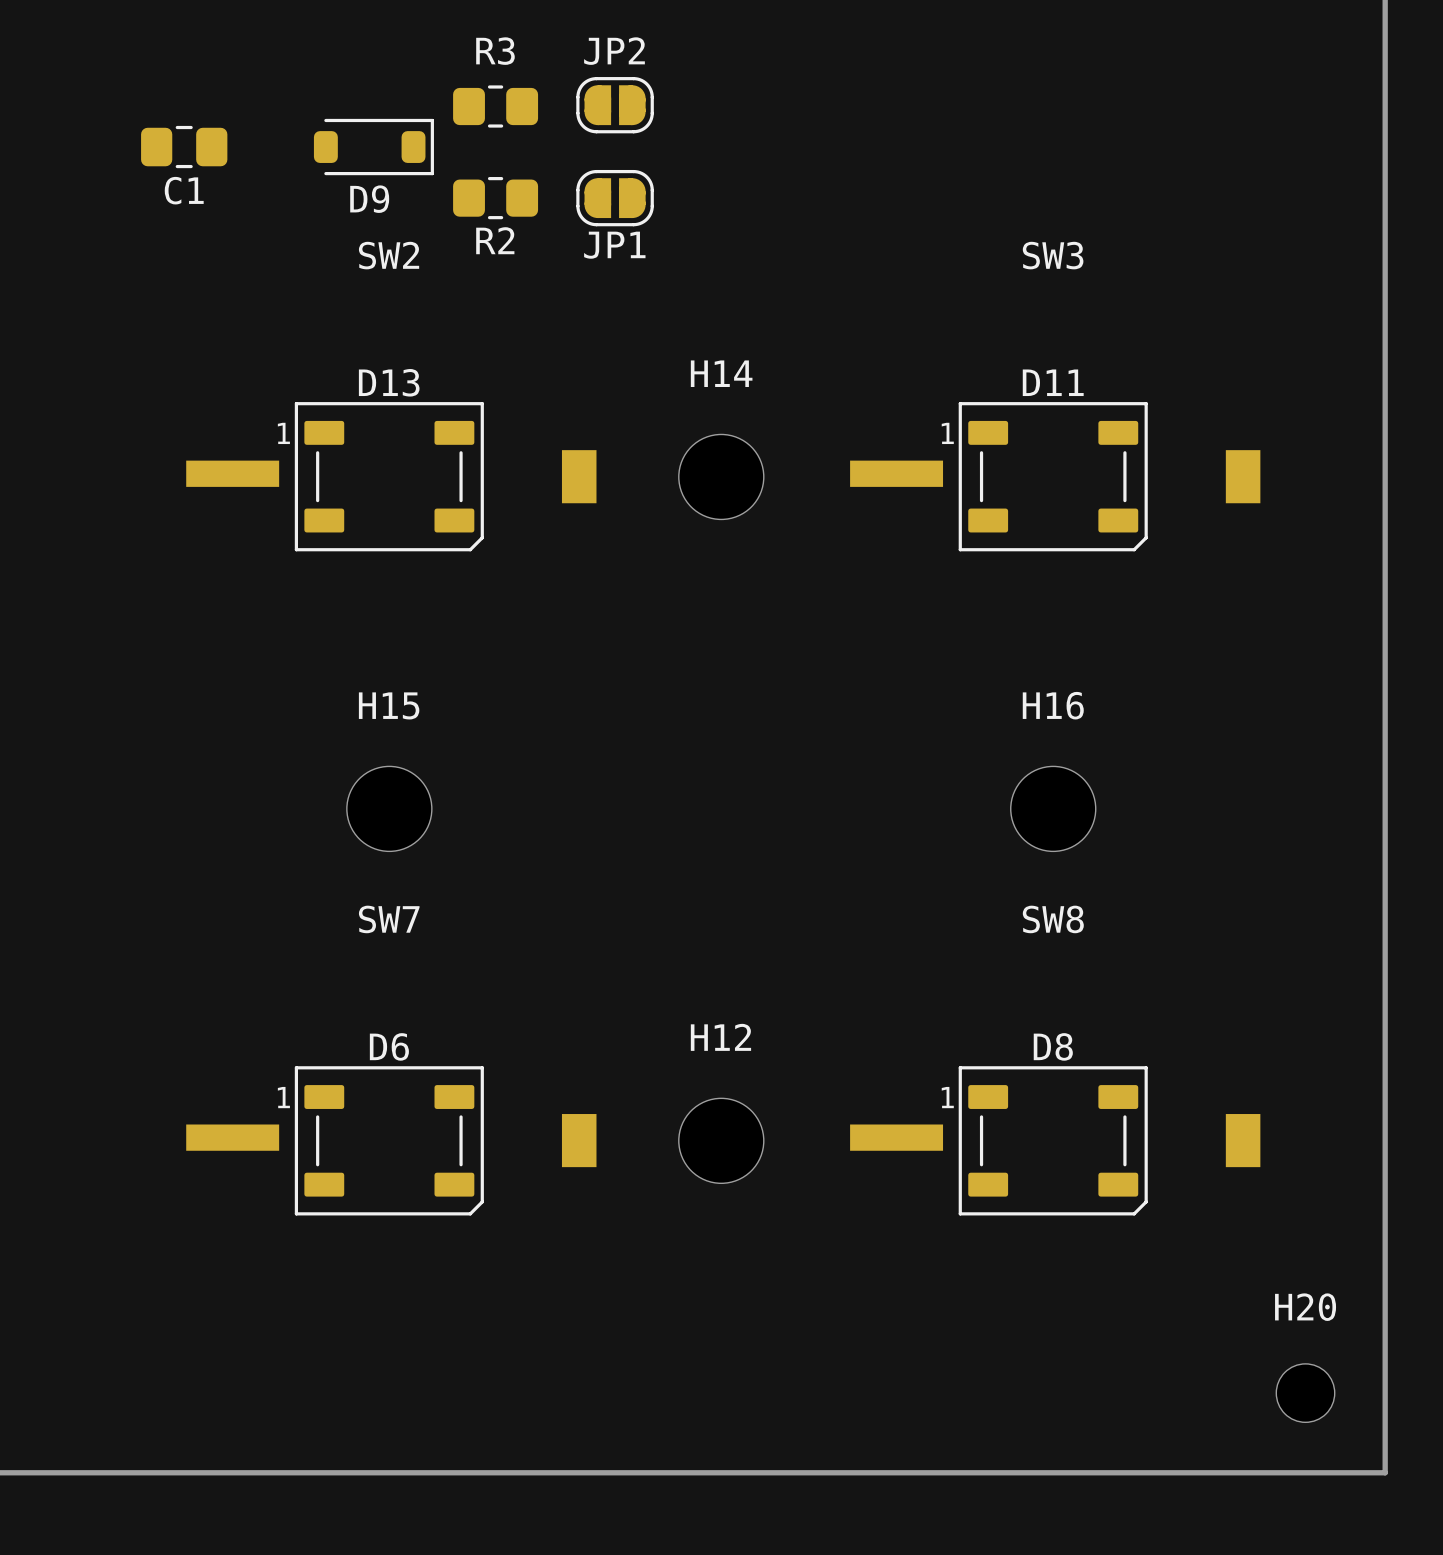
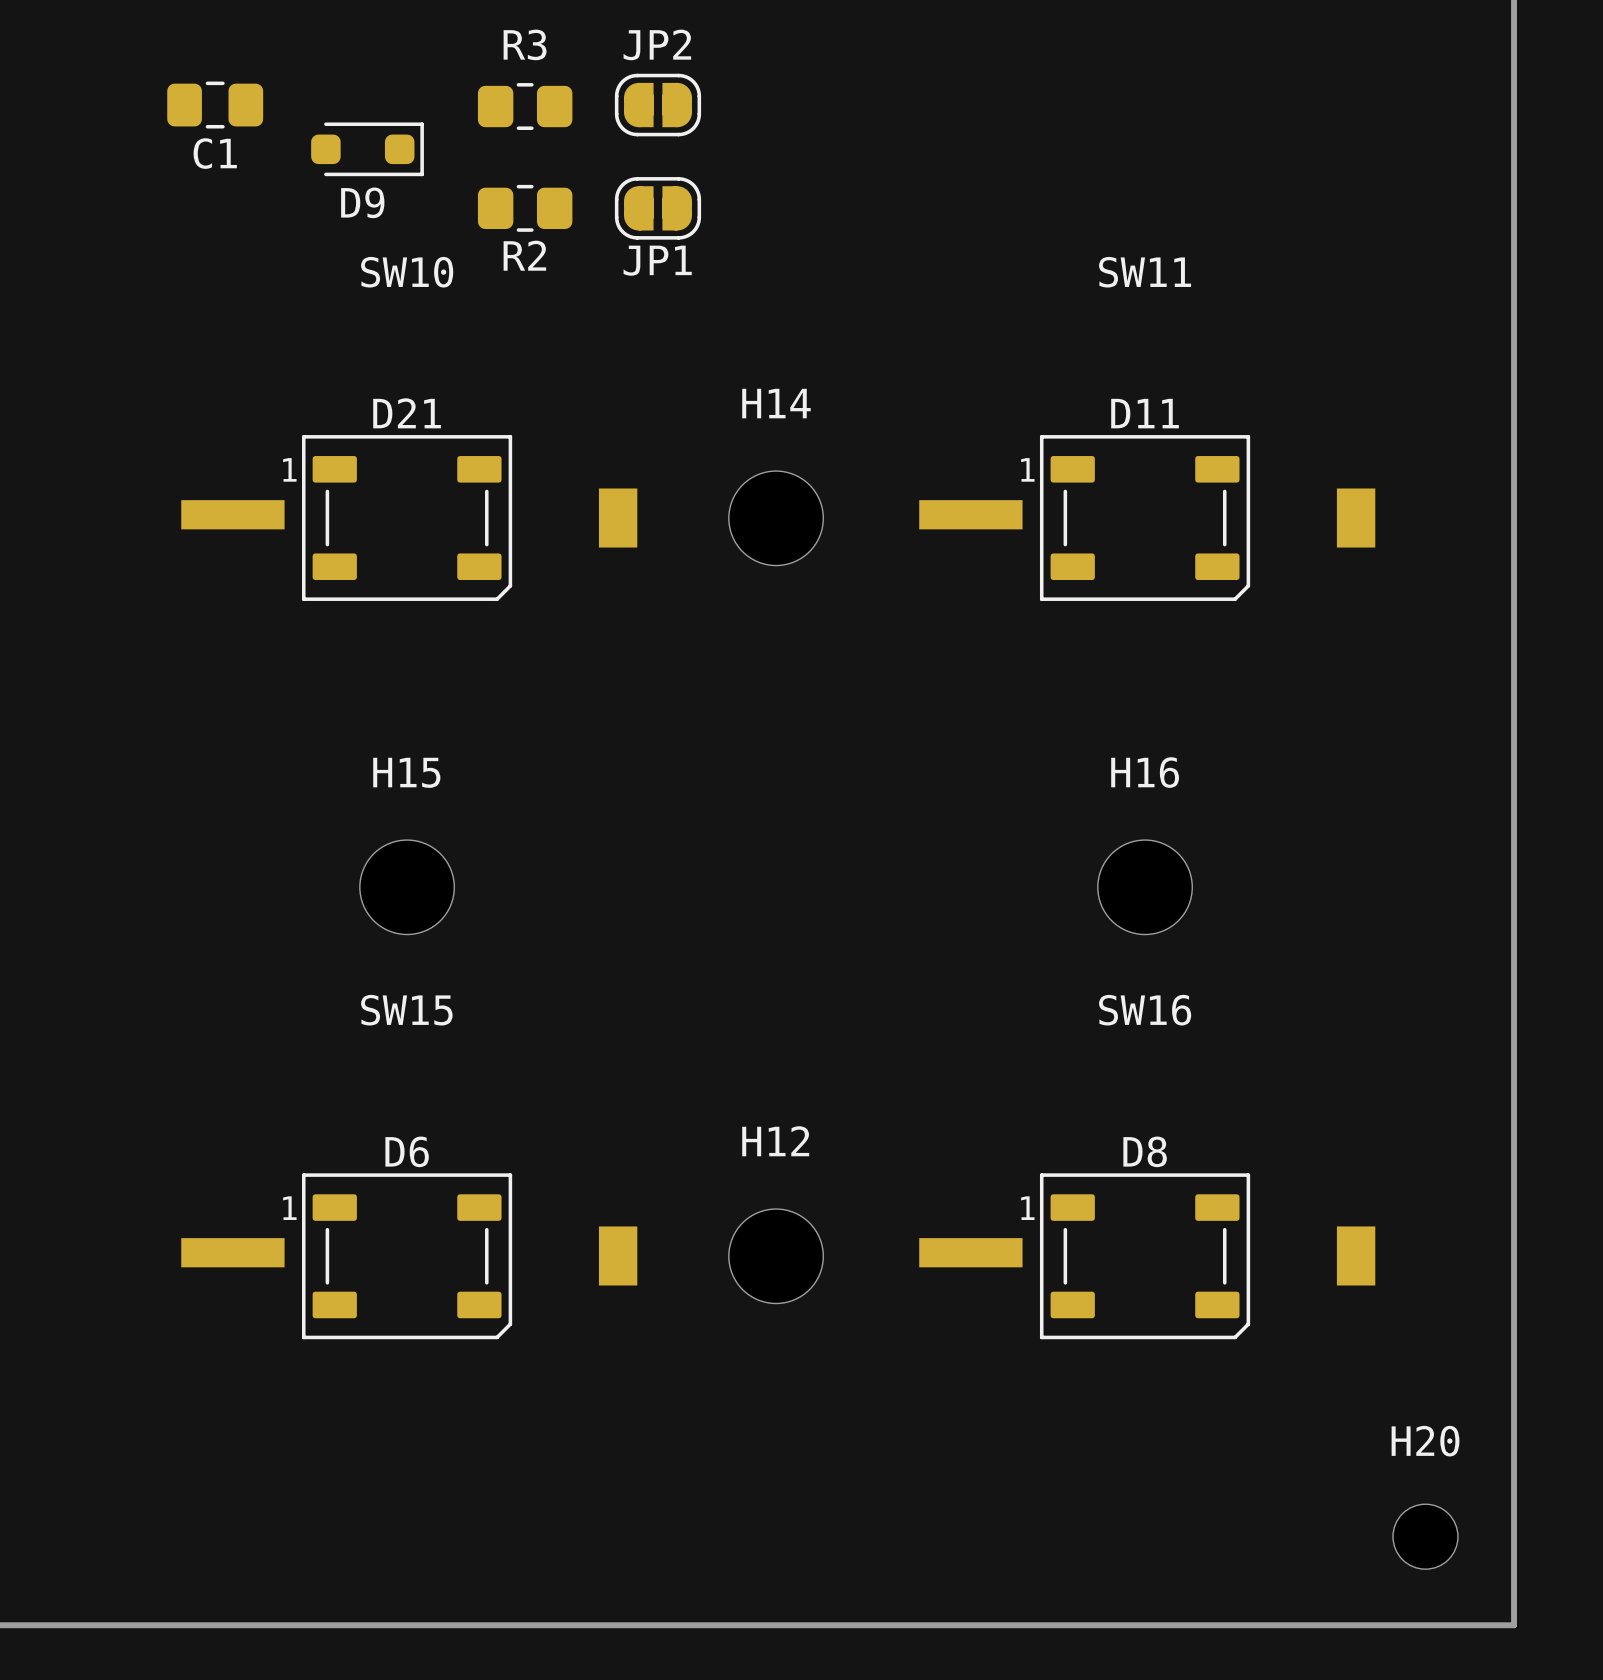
D9 footprint: [313, 118, 434, 176] -> [311, 122, 424, 177]
C1 position: (184, 147) -> (215, 105)
SW2 name: SW2 (389, 255) -> SW10 (407, 272)
SW3 name: SW3 (1053, 255) -> SW11 (1145, 272)
D13 name: D13 (389, 382) -> D21 (407, 413)
SW7 name: SW7 (389, 919) -> SW15 (406, 1010)
SW8 name: SW8 (1053, 919) -> SW16 (1145, 1010)

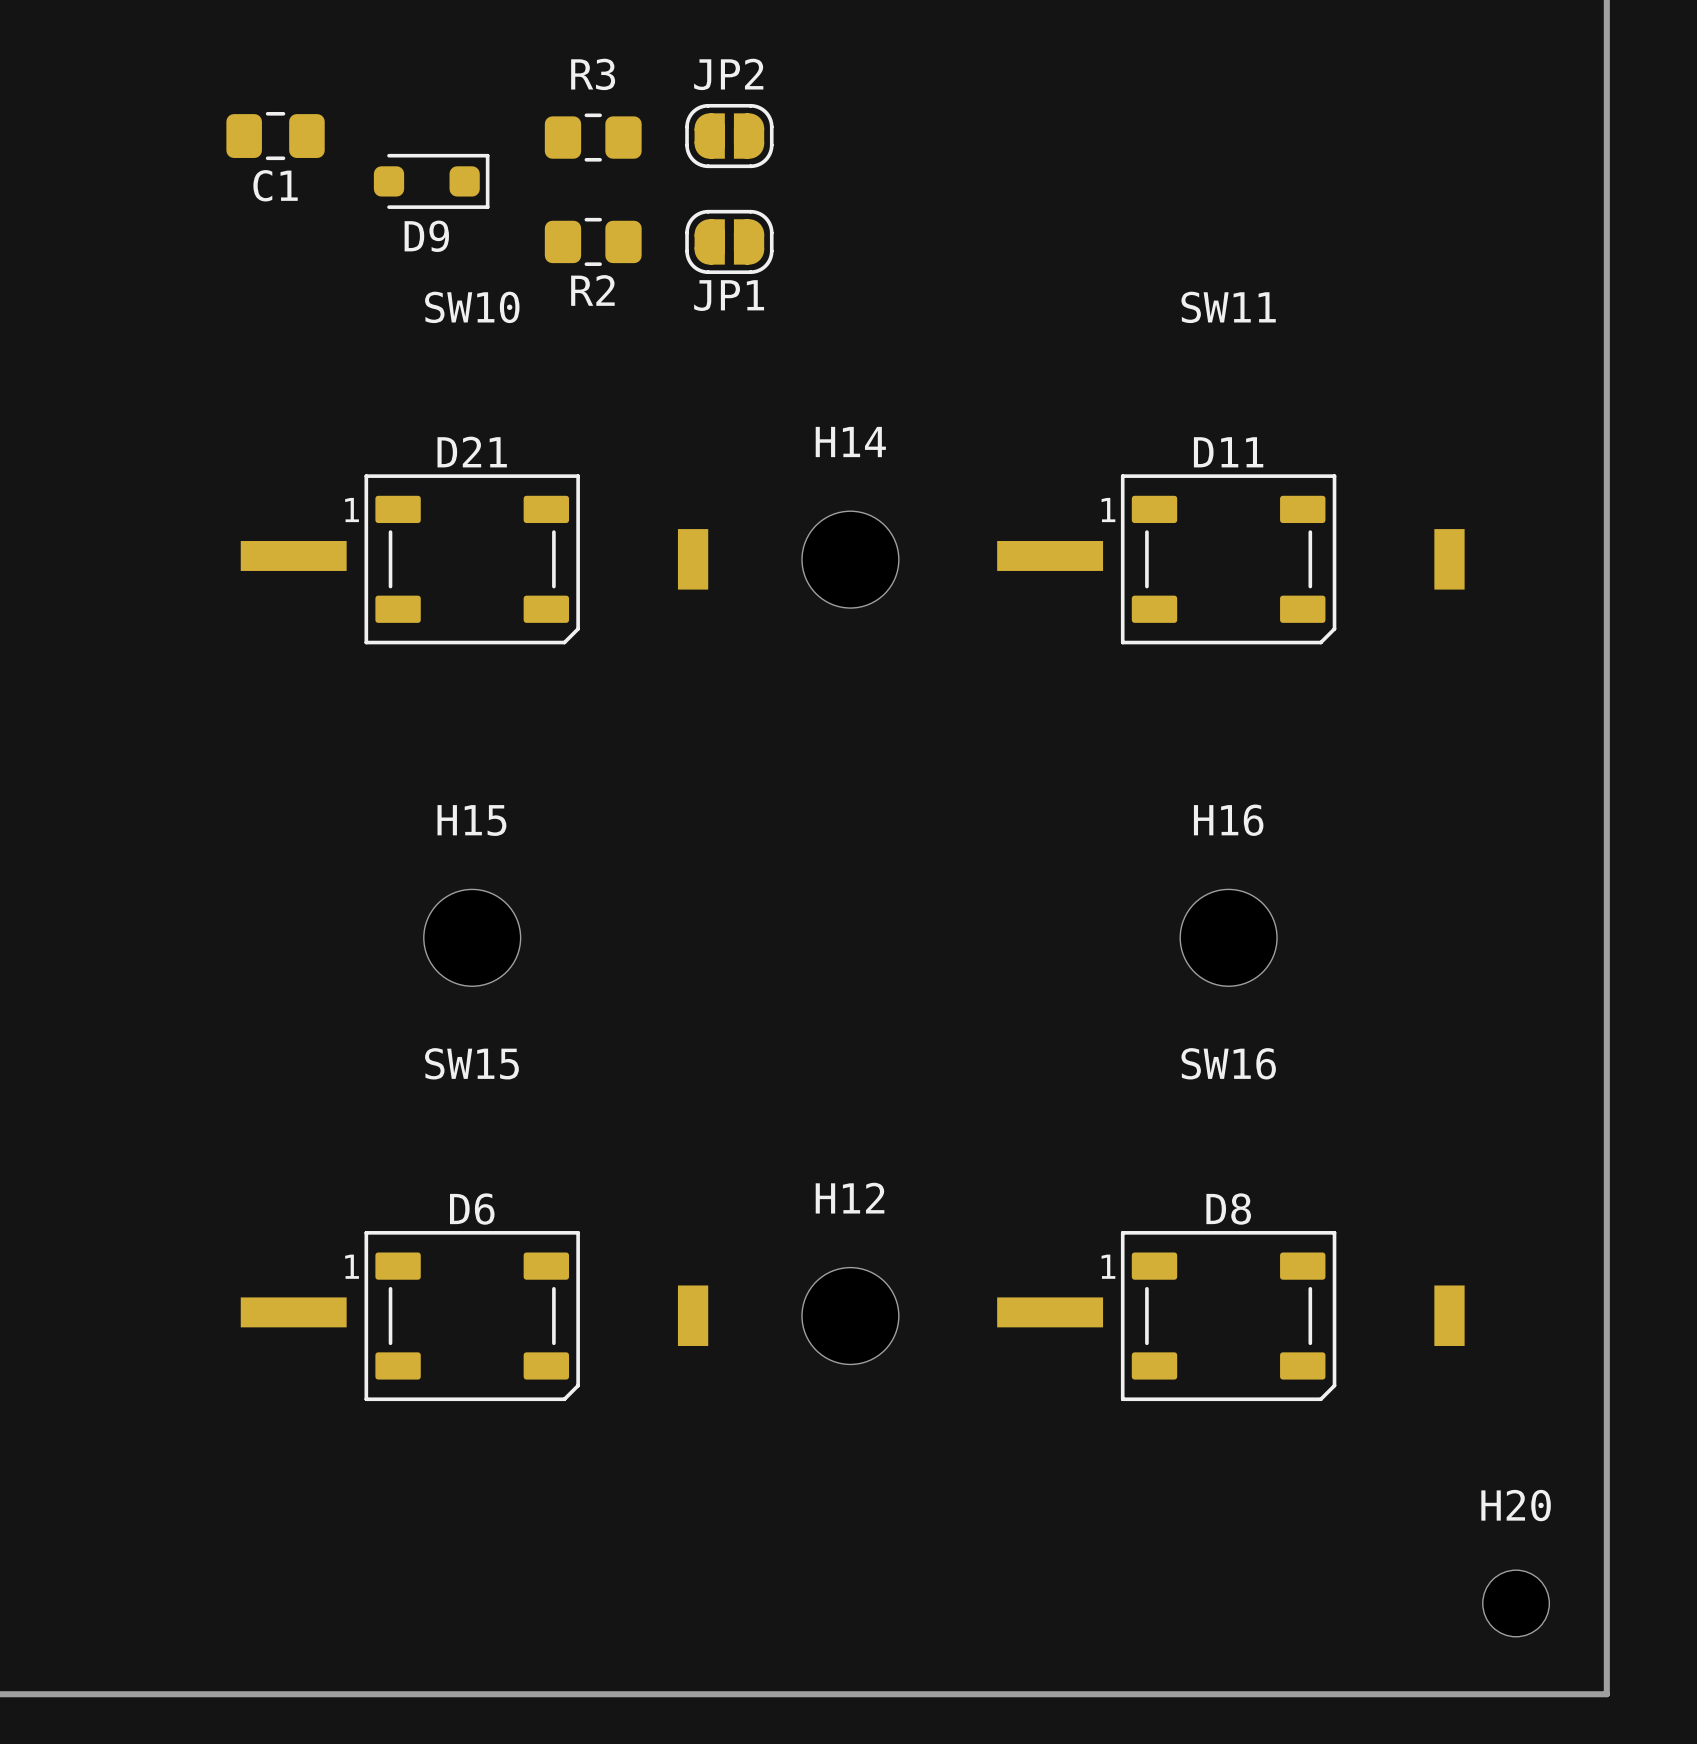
SW10 footprint: [181, 488, 638, 548] -> [240, 529, 709, 590]
SW11 footprint: [919, 488, 1376, 548] -> [997, 529, 1465, 590]
SW15 footprint: [181, 1226, 638, 1286] -> [240, 1285, 709, 1346]
SW16 footprint: [919, 1226, 1376, 1286] -> [997, 1285, 1465, 1346]

